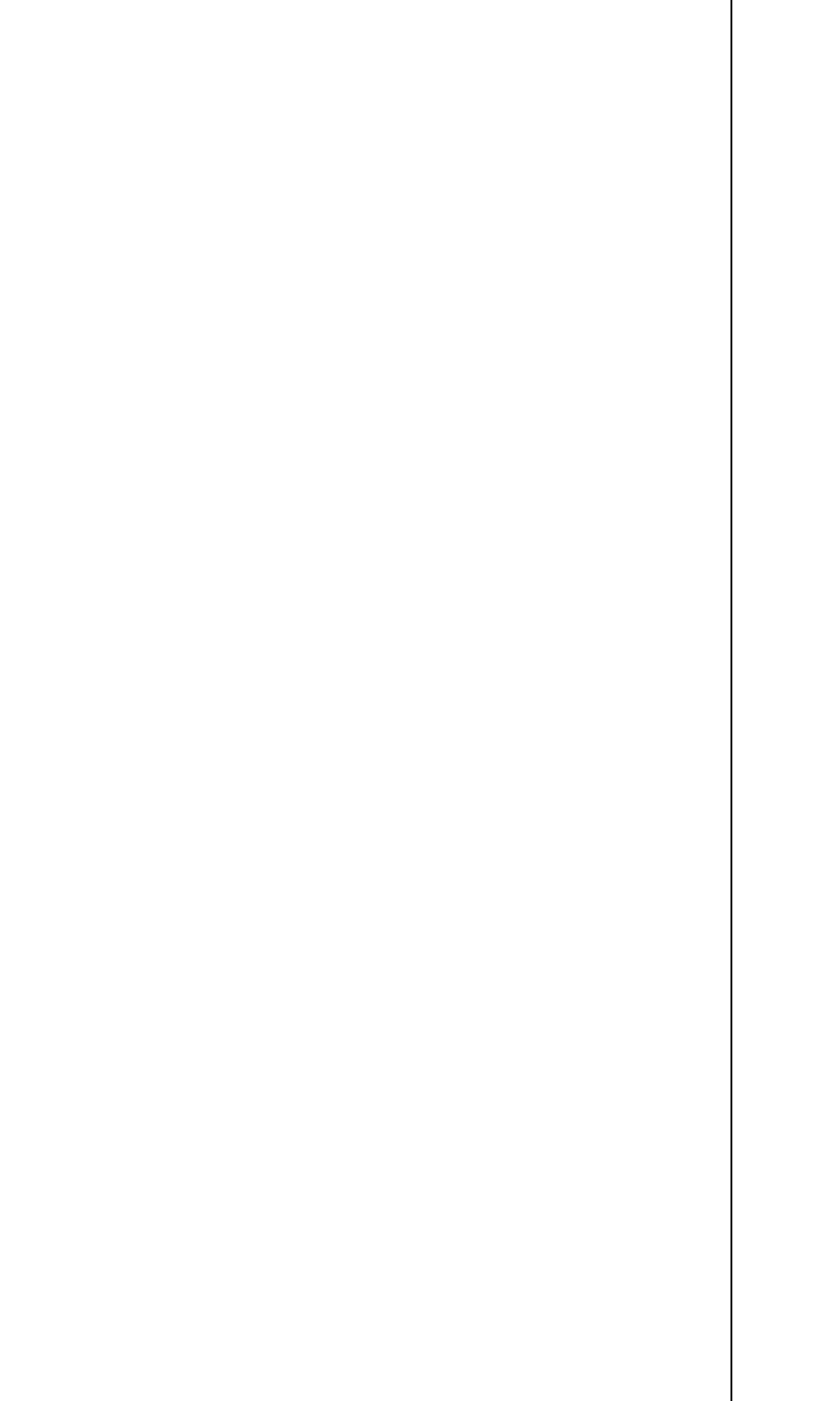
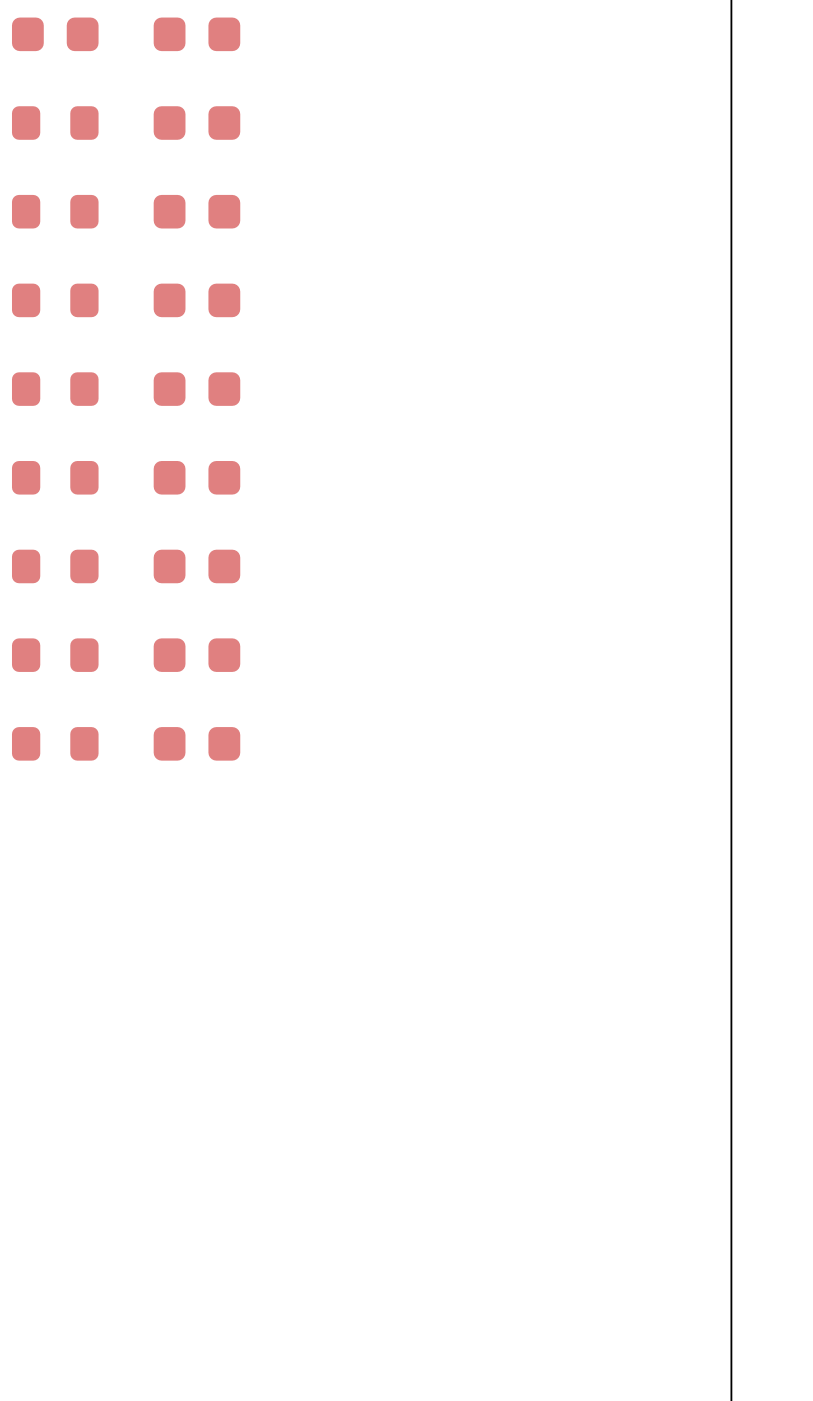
part: none -> (55, 34)
part: none -> (196, 34)
part: none -> (55, 123)
part: none -> (196, 123)
part: none -> (55, 211)
part: none -> (196, 211)
part: none -> (55, 300)
part: none -> (196, 300)
part: none -> (55, 389)
part: none -> (196, 389)
part: none -> (55, 477)
part: none -> (196, 477)
part: none -> (55, 566)
part: none -> (196, 566)
part: none -> (55, 655)
part: none -> (196, 655)
part: none -> (55, 743)
part: none -> (196, 743)

